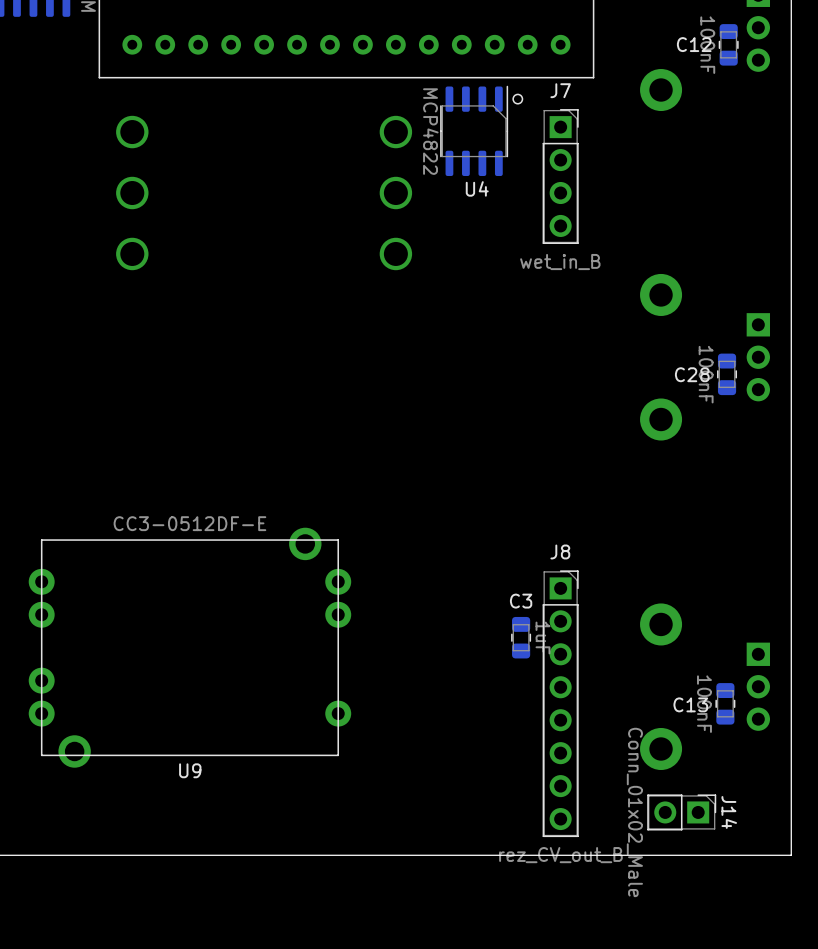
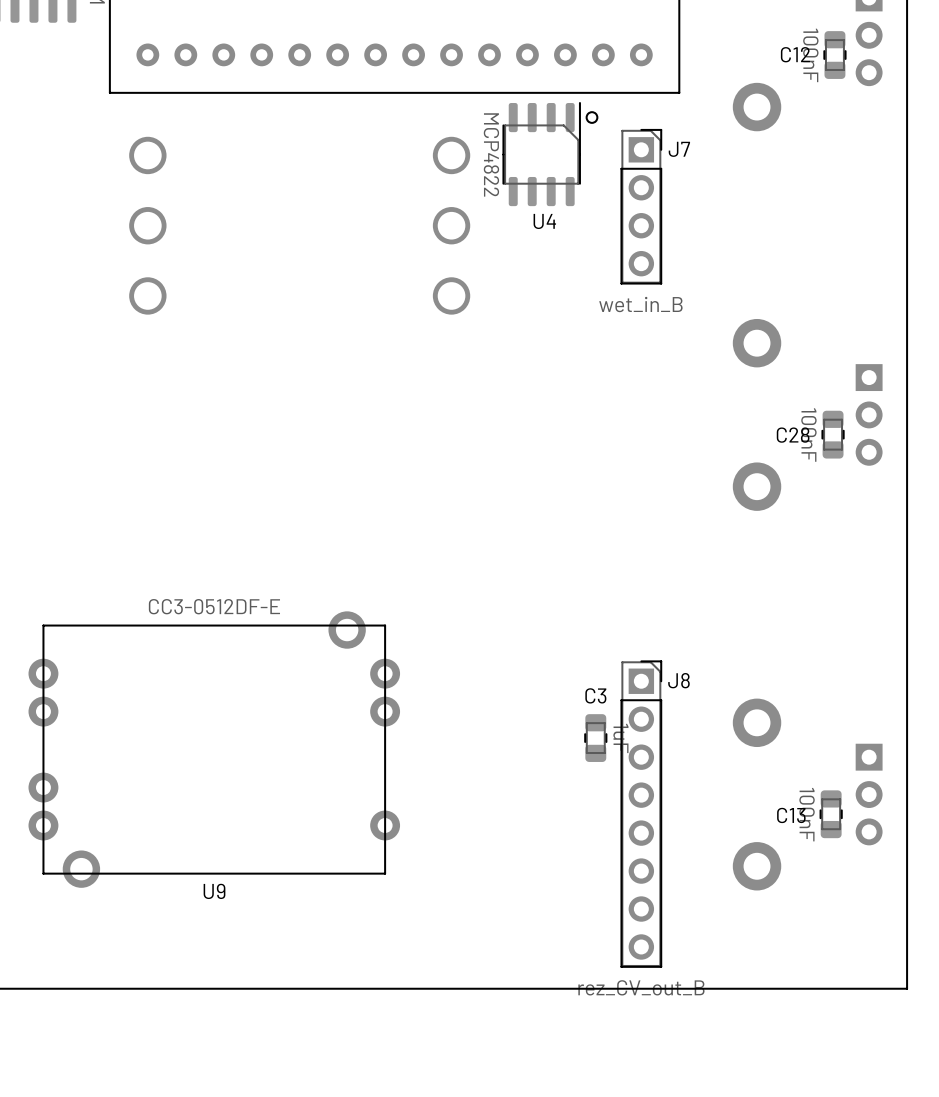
J7 name position: J7 (560, 90) -> J7 (679, 149)
J8 name position: J8 (560, 551) -> J8 (678, 680)
J14: Conn_01x02_Male (681, 812) -> none

